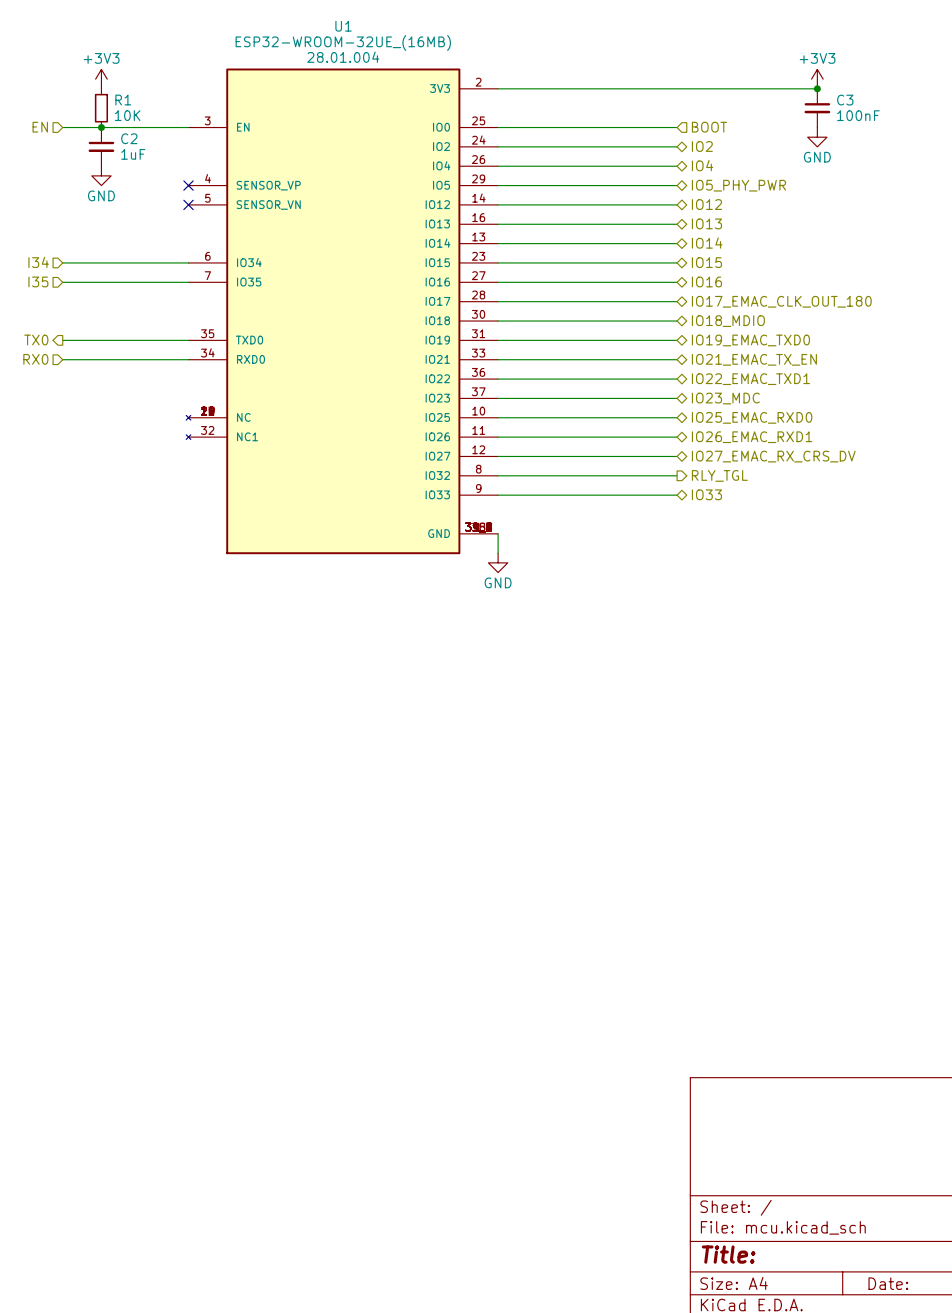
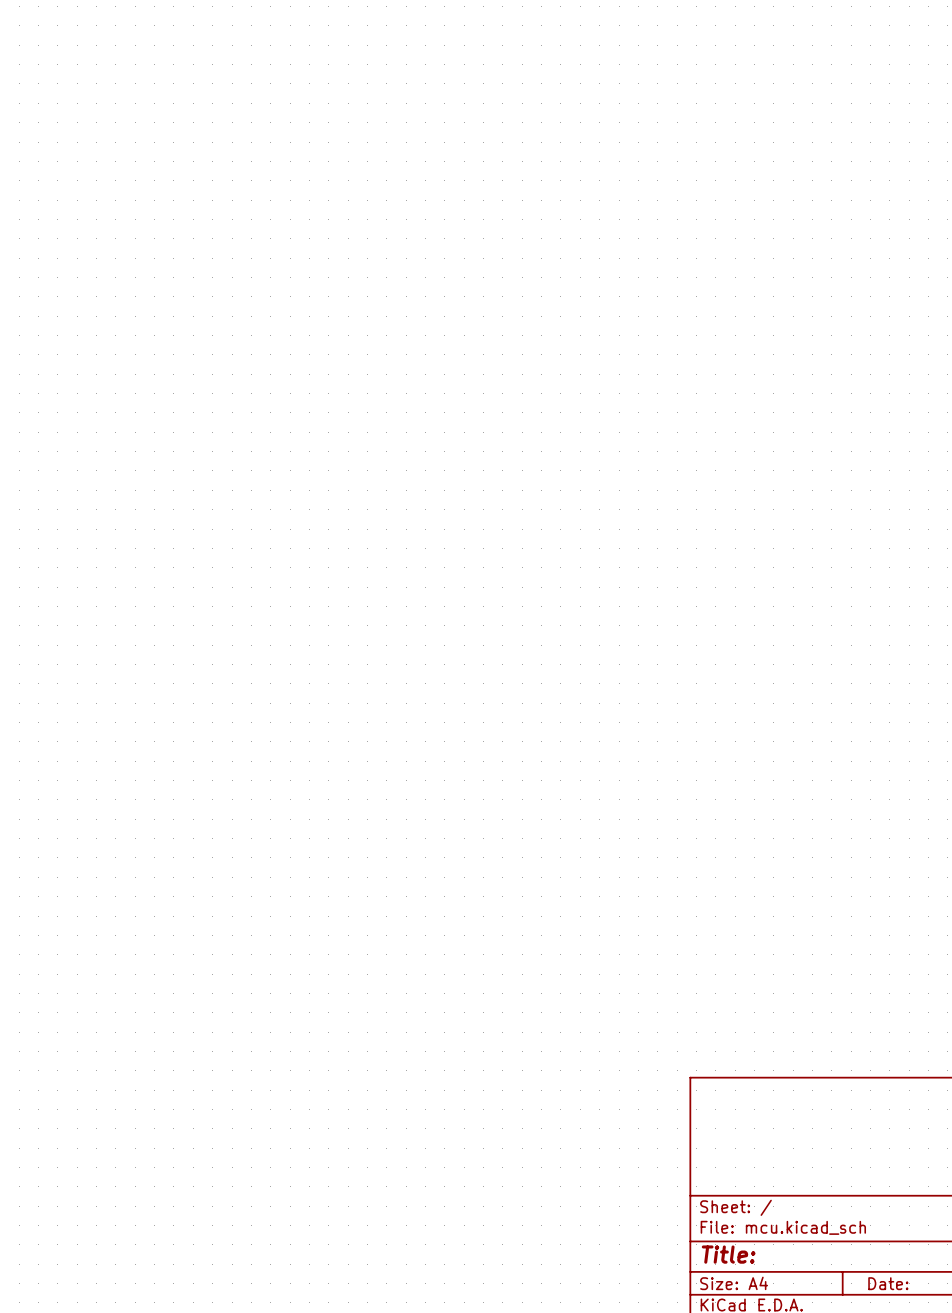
power symbol: +3V3 (101, 79) -> none
power symbol: +3V3 (817, 79) -> none
wire: (498, 88) (817, 88) -> none
junction: (817, 88) -> none
R1: 10K (101, 108) -> none
C3: 100nF (817, 108) -> none
hierarchical label: EN (40, 127) -> none
wire: (62, 127) (188, 127) -> none
junction: (101, 127) -> none
wire: (498, 127) (677, 127) -> none
hierarchical label: BOOT (709, 127) -> none
power symbol: GND (817, 137) -> none
C2: 1uF (101, 146) -> none
wire: (498, 146) (677, 146) -> none
hierarchical label: IO2 (702, 146) -> none
hierarchical label: IO4 (702, 165) -> none
wire: (498, 166) (677, 166) -> none
power symbol: GND (101, 175) -> none
no-connect mark: (188, 185) -> none
wire: (498, 185) (677, 185) -> none
hierarchical label: IO5_PHY_PWR (738, 185) -> none
no-connect mark: (188, 204) -> none
wire: (498, 204) (677, 204) -> none
hierarchical label: IO12 (706, 204) -> none
hierarchical label: IO13 (706, 223) -> none
wire: (498, 224) (677, 224) -> none
wire: (498, 243) (677, 243) -> none
hierarchical label: IO14 (707, 243) -> none
hierarchical label: I34 (38, 262) -> none
wire: (62, 262) (188, 262) -> none
wire: (498, 262) (677, 262) -> none
hierarchical label: IO15 (706, 262) -> none
hierarchical label: I35 (38, 281) -> none
hierarchical label: IO16 (706, 281) -> none
wire: (62, 282) (188, 282) -> none
wire: (498, 282) (677, 282) -> none
wire: (498, 301) (677, 301) -> none
hierarchical label: IO17_EMAC_CLK_OUT_180 (781, 301) -> none
U1: ESP32-WROOM-32UE_(16MB) (342, 311) -> none
wire: (498, 321) (677, 321) -> none
hierarchical label: IO18_MDIO (728, 321) -> none
hierarchical label: TX0 (36, 340) -> none
wire: (62, 340) (188, 340) -> none
wire: (498, 340) (677, 340) -> none
hierarchical label: IO19_EMAC_TXD0 (750, 340) -> none
hierarchical label: RX0 (35, 359) -> none
wire: (62, 359) (188, 359) -> none
wire: (498, 359) (677, 359) -> none
hierarchical label: IO21_EMAC_TX_EN (754, 359) -> none
wire: (498, 379) (677, 379) -> none
hierarchical label: IO22_EMAC_TXD1 (750, 379) -> none
wire: (498, 398) (677, 398) -> none
hierarchical label: IO23_MDC (725, 398) -> none
wire: (498, 417) (677, 417) -> none
hierarchical label: IO25_EMAC_RXD0 (752, 417) -> none
wire: (498, 437) (677, 437) -> none
hierarchical label: IO26_EMAC_RXD1 (752, 437) -> none
wire: (498, 456) (677, 456) -> none
hierarchical label: IO27_EMAC_RX_CRS_DV (773, 456) -> none
wire: (498, 475) (677, 475) -> none
hierarchical label: RLY_TGL (719, 475) -> none
hierarchical label: IO33 (706, 494) -> none
wire: (498, 495) (677, 495) -> none
wire: (498, 533) (498, 553) -> none
power symbol: GND (498, 562) -> none

